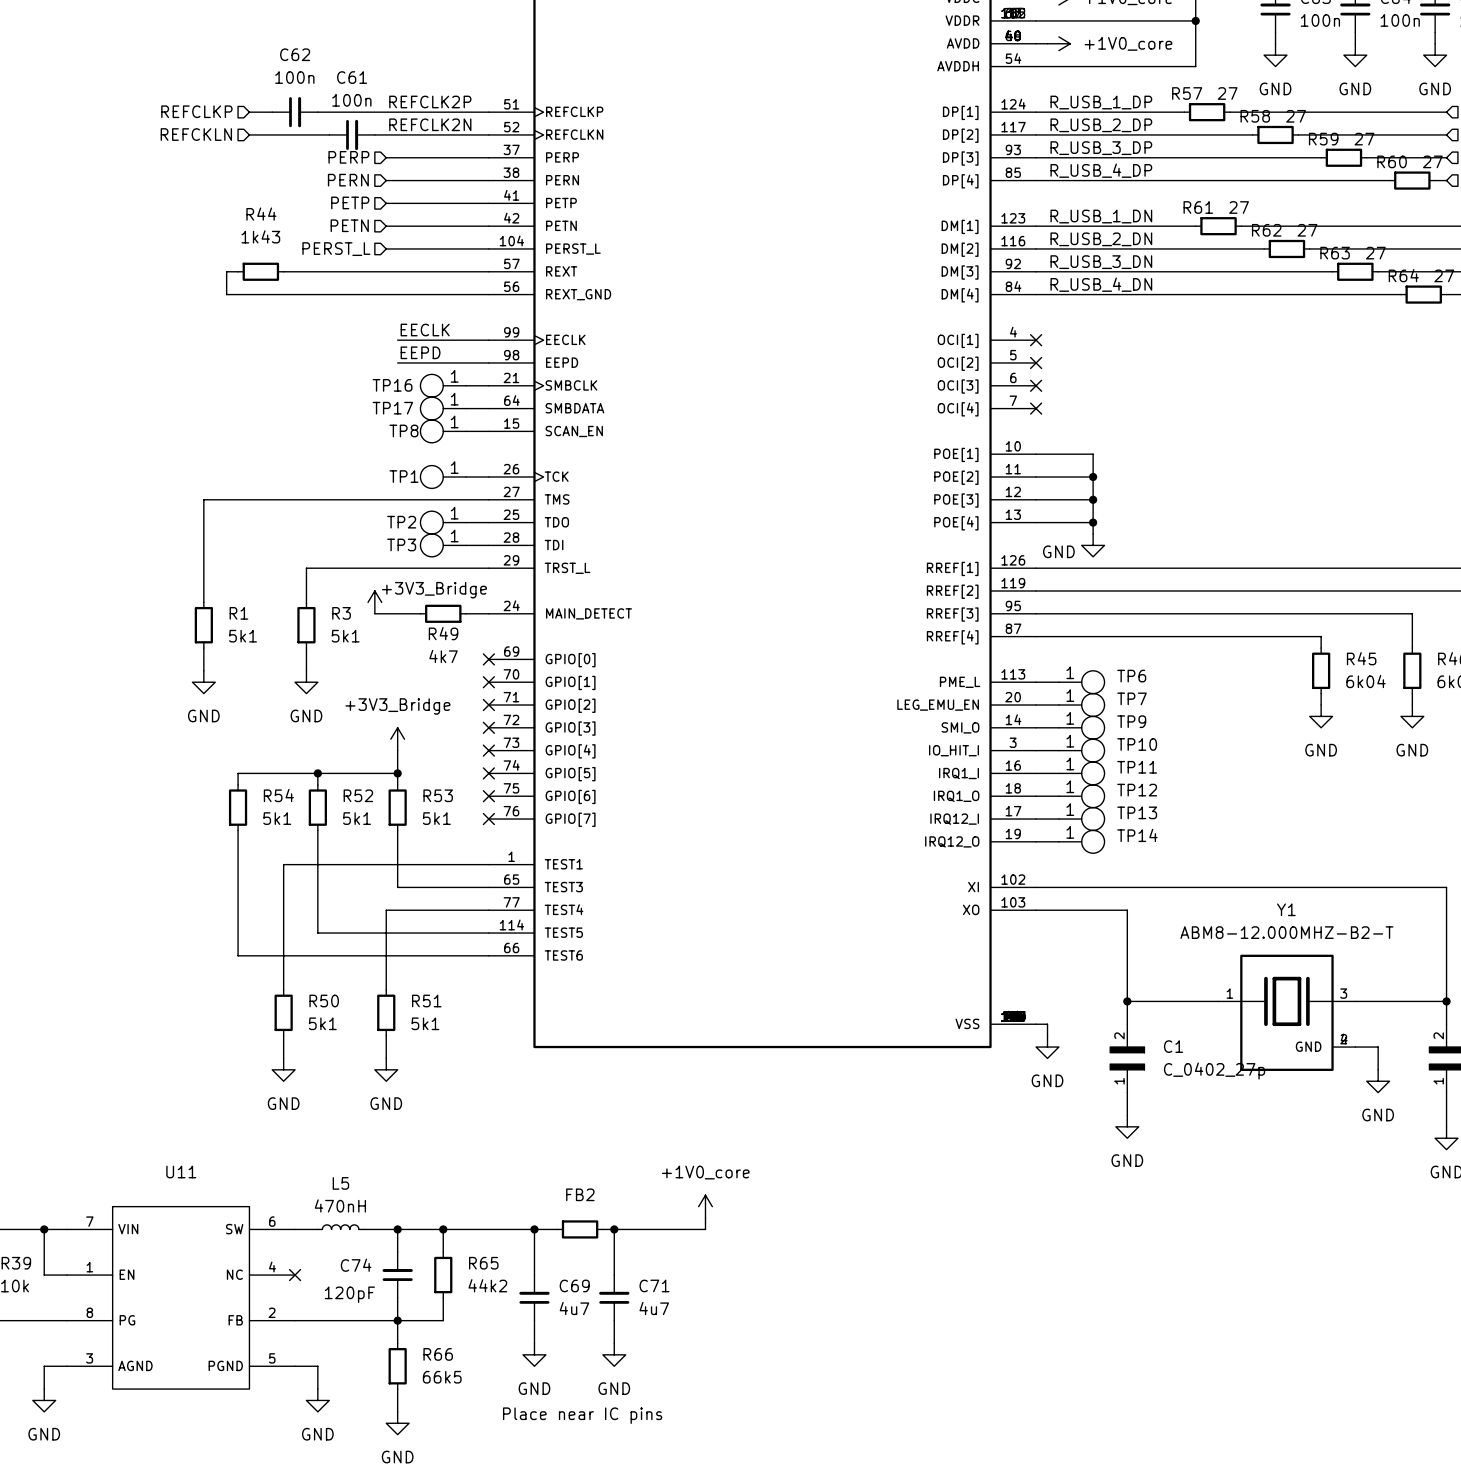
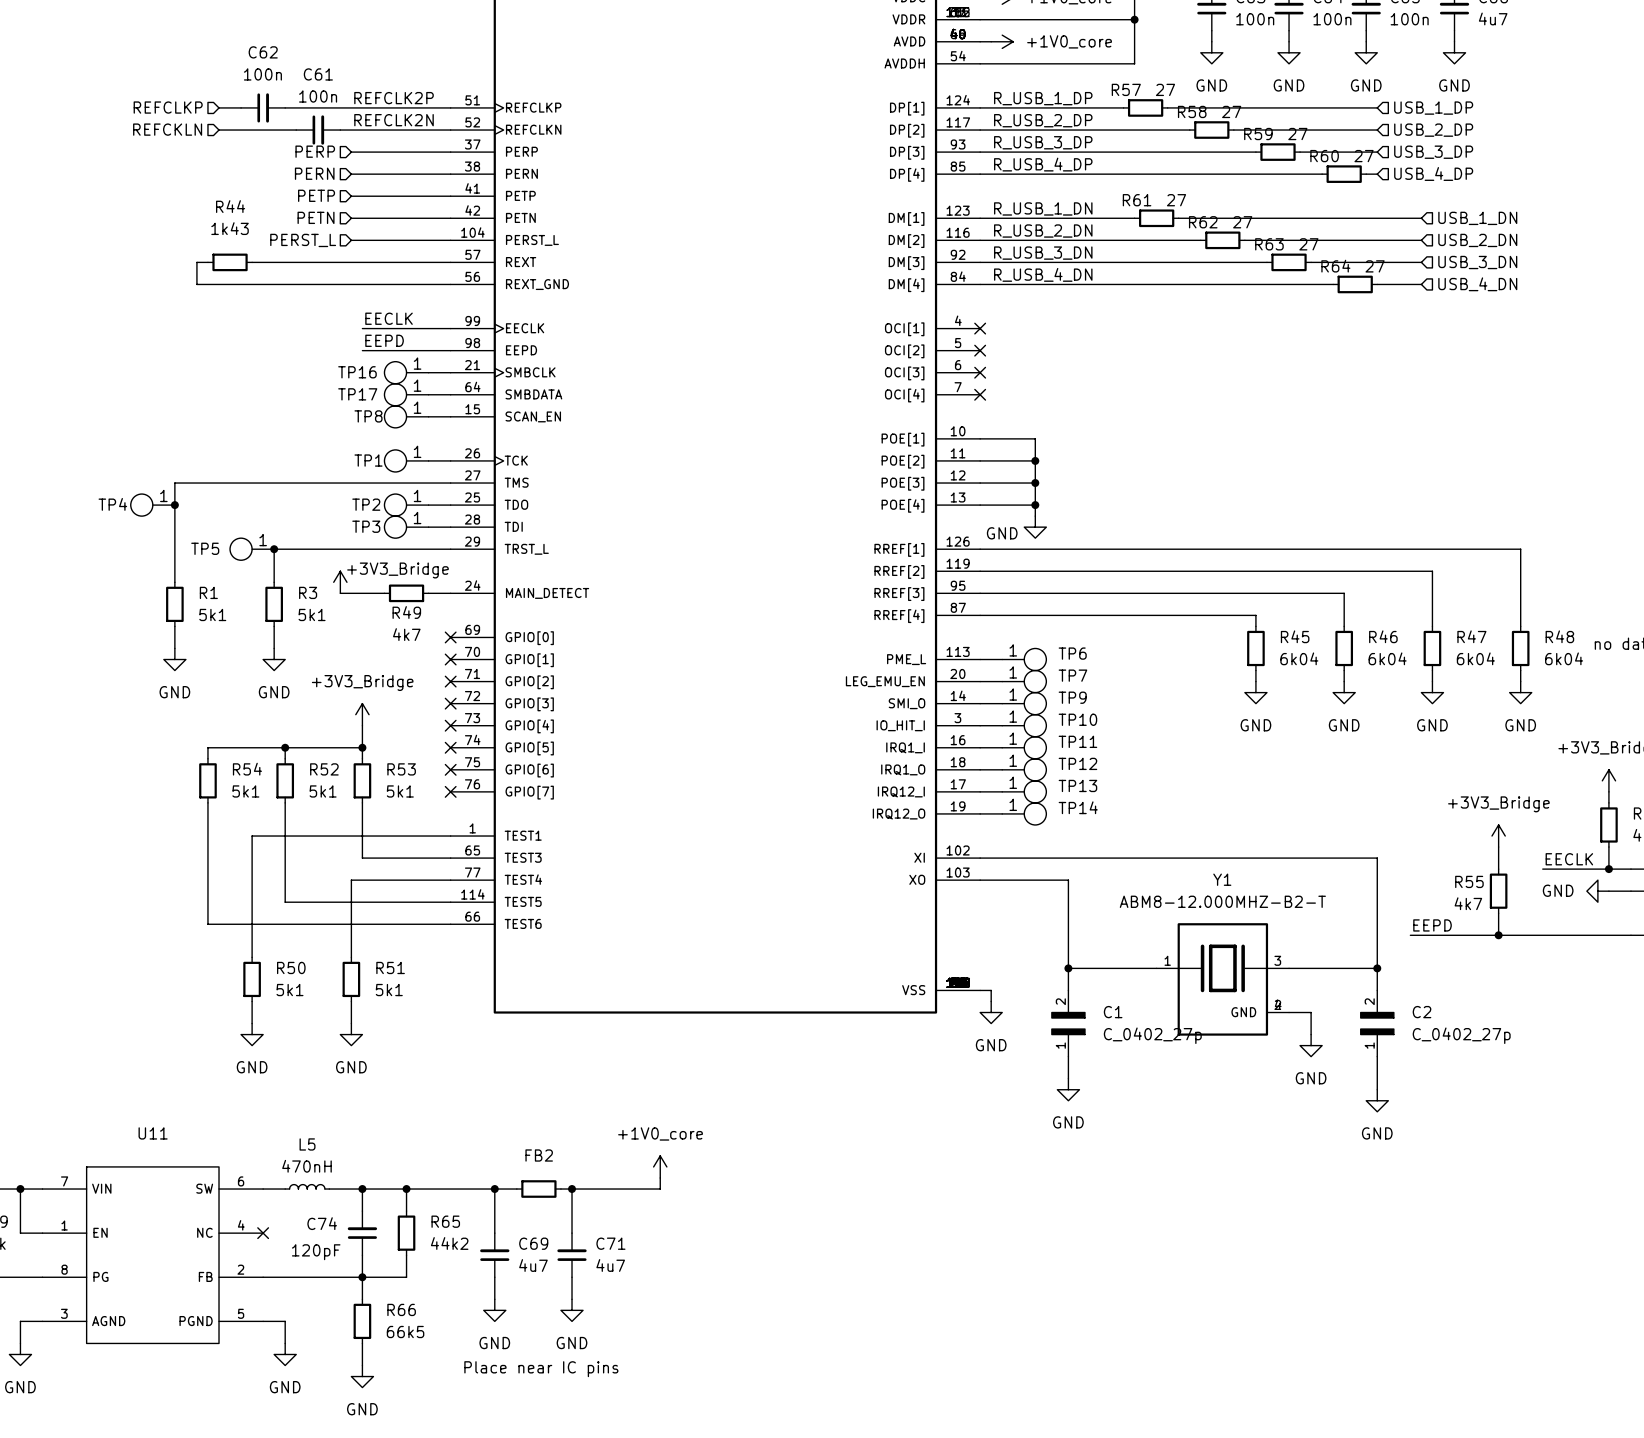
TP4: none -> (152, 505)
junction: none -> (174, 505)
TP5: none -> (252, 549)
junction: none -> (274, 549)

